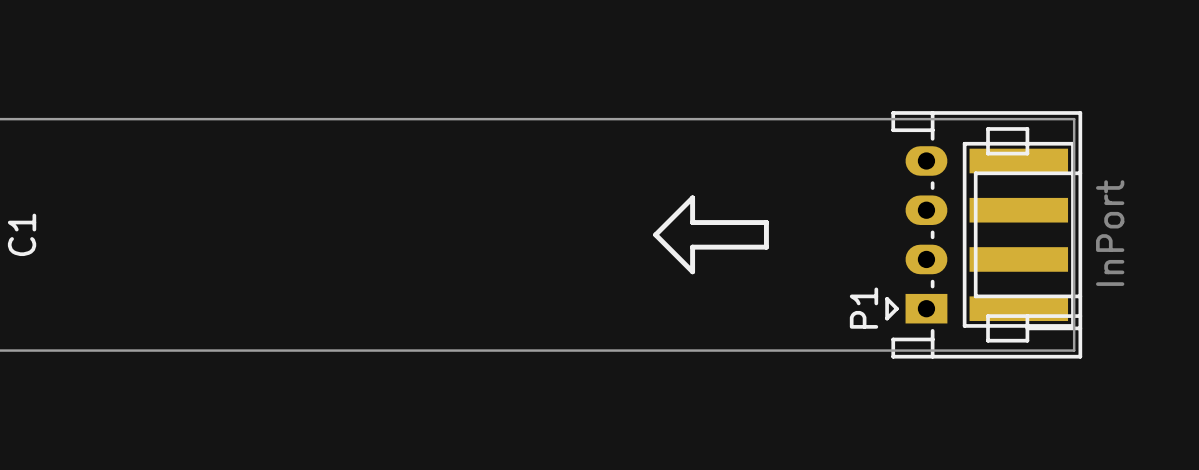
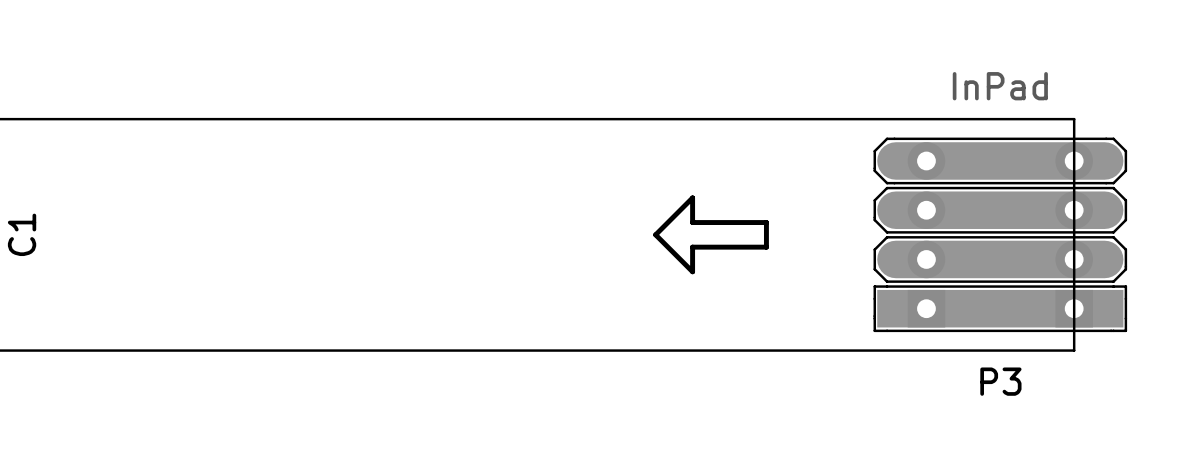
P1: InPort (983, 234) -> none
P3: none -> InPad (1000, 234)
part: (1018, 234) -> none

